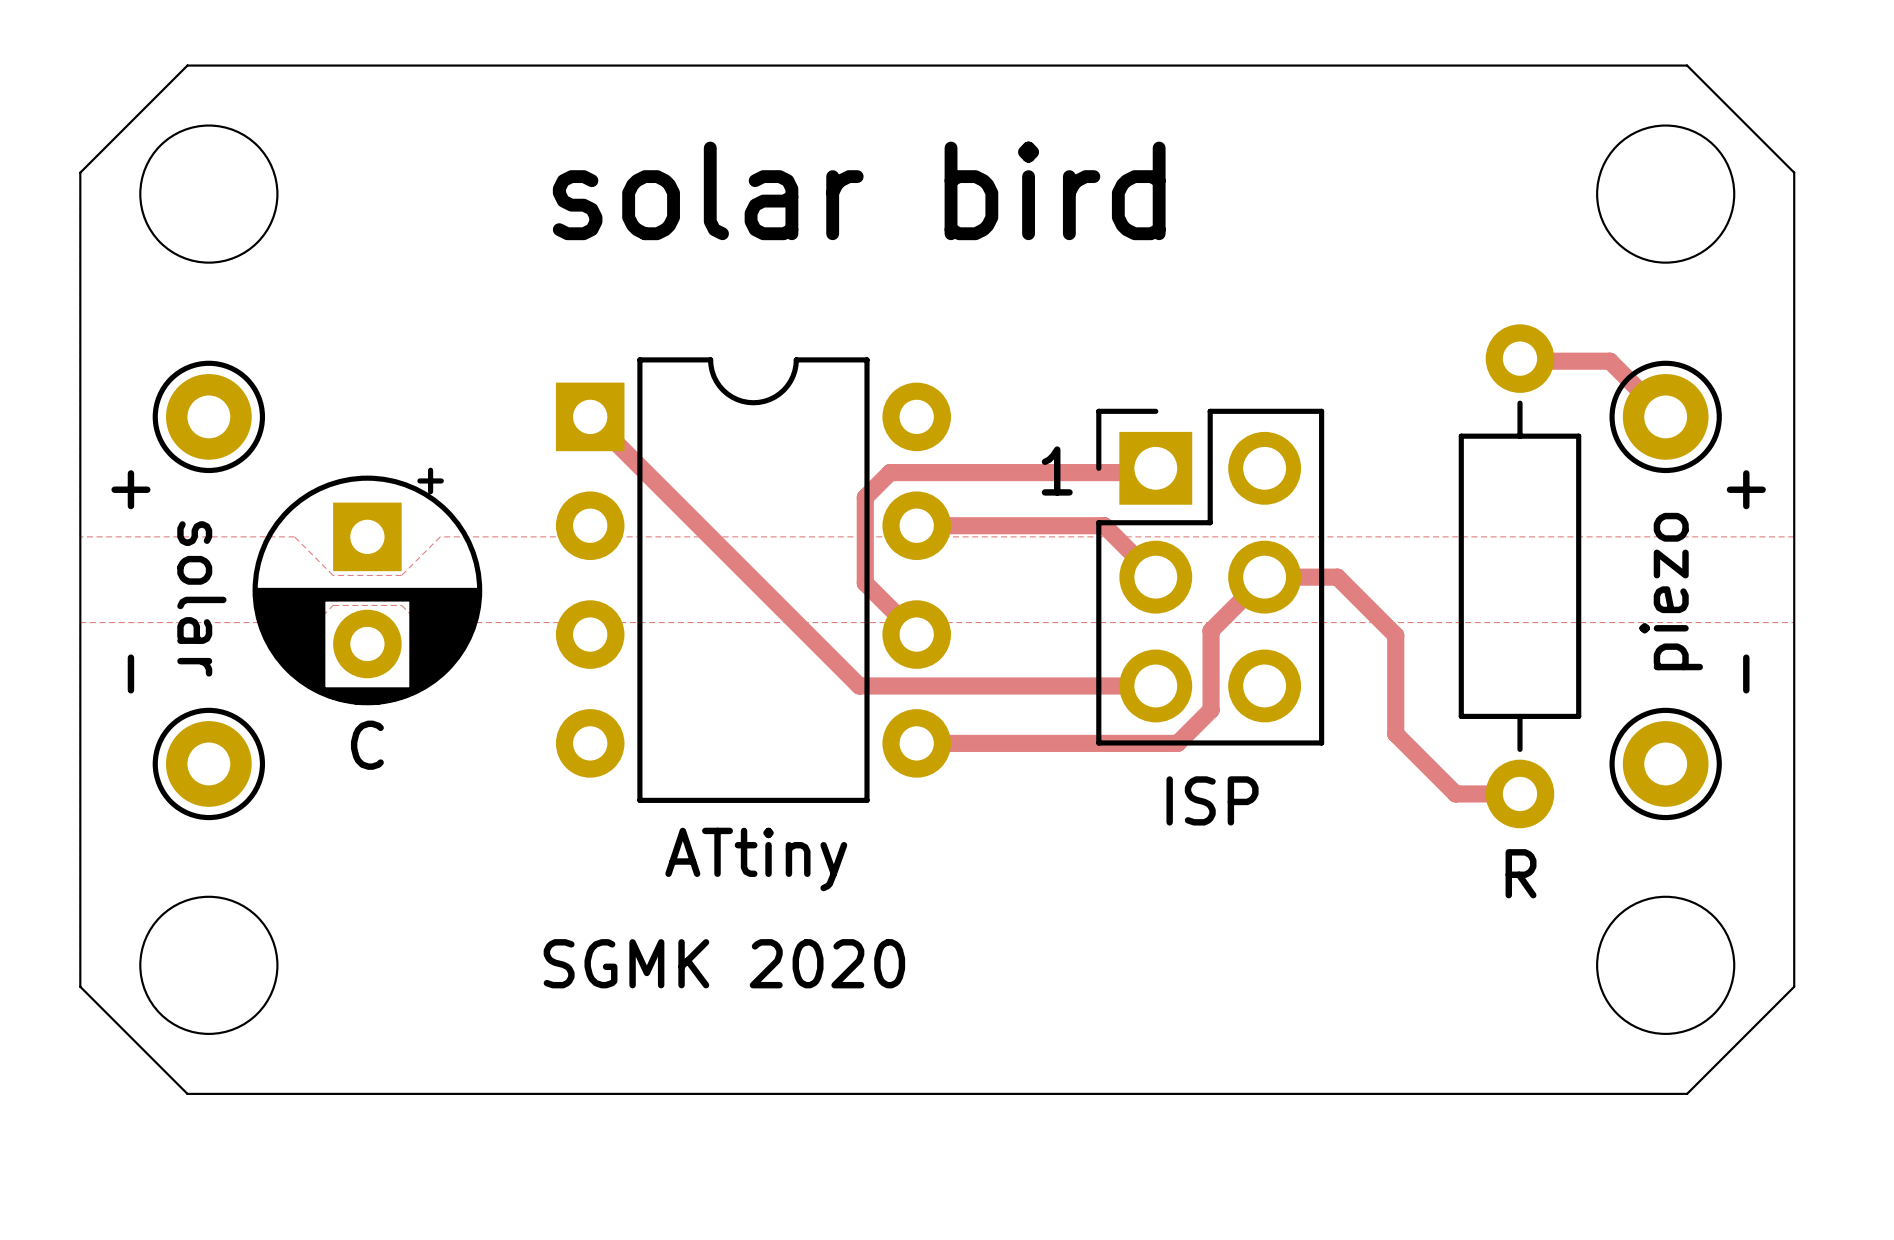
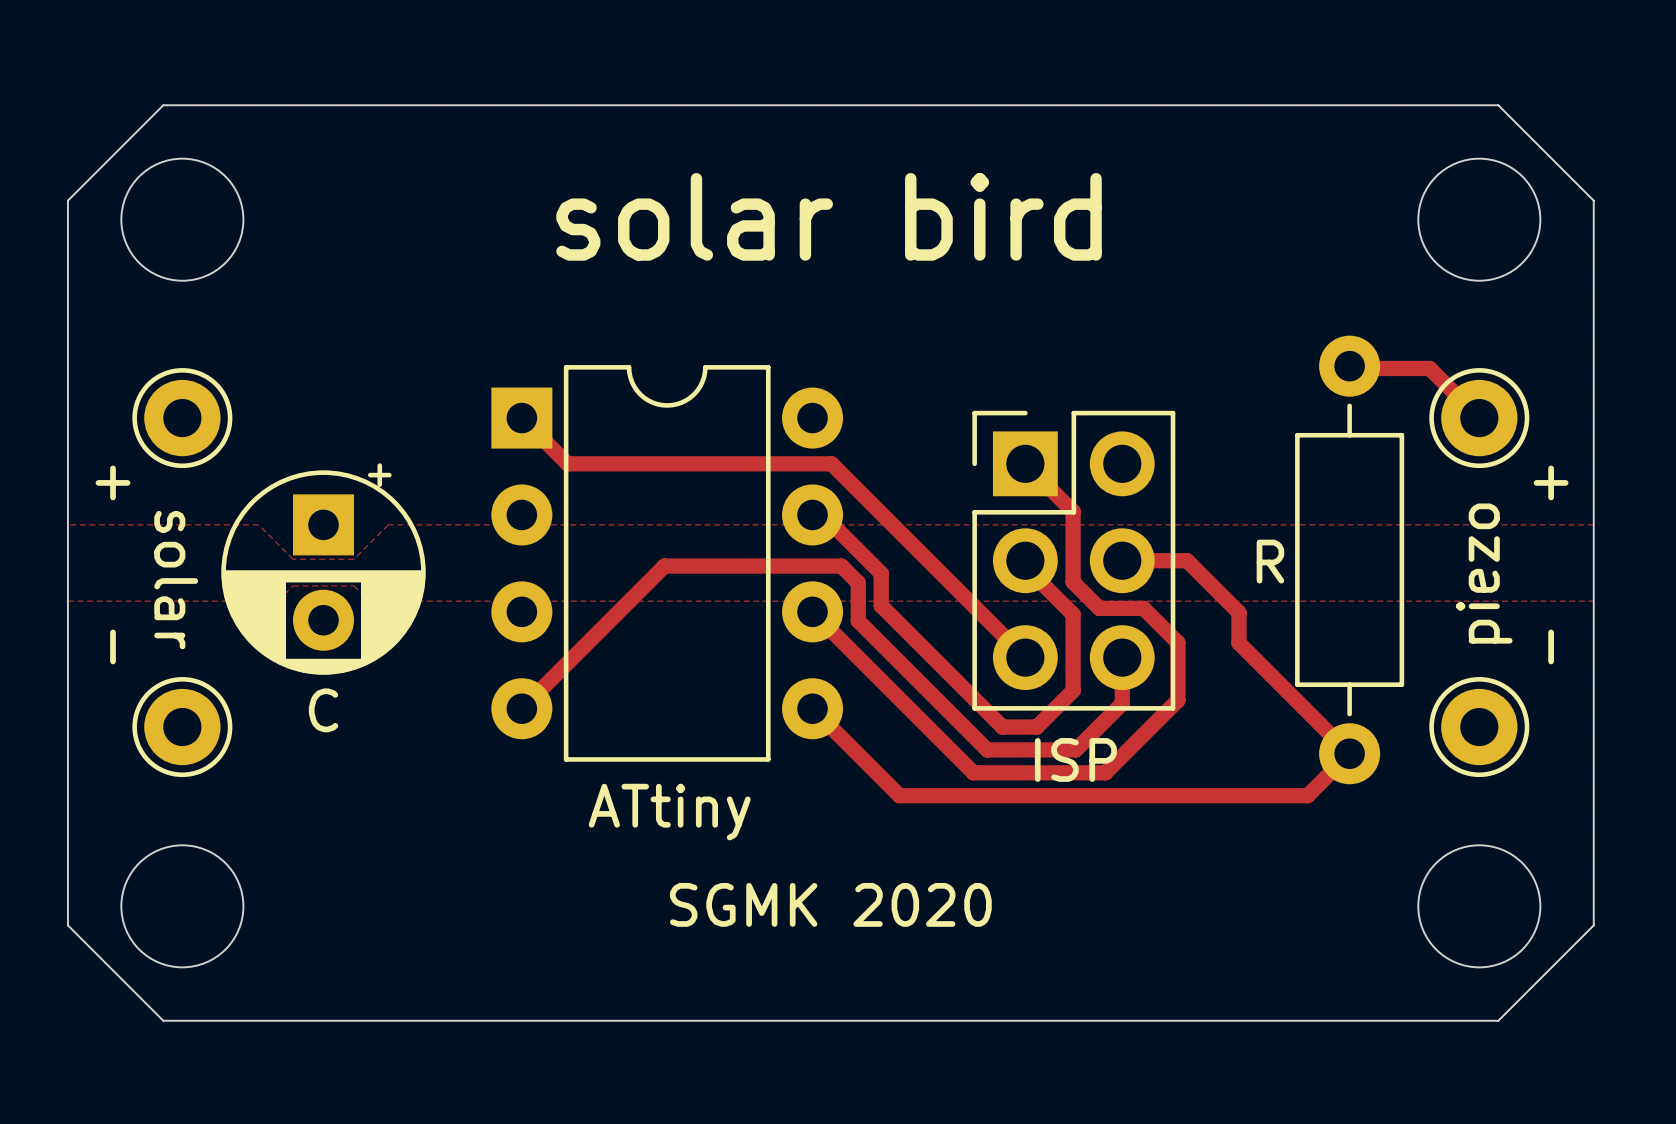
text position: solar bird (859, 190) -> solar bird (829, 216)
track: (641, 468) (859, 685) (1155, 685) -> (567, 463) (831, 463) (1025, 657)
track: (1155, 468) (1151, 472) (890, 472) (865, 497) (865, 583) (916, 634) -> (1025, 463) (1073, 511) (1073, 582) (1099, 608) (1143, 608) (1177, 642) (1177, 700) (1105, 772) (973, 772) (812, 611)
text: 1 (1057, 470) -> none
track: (928, 525) (1104, 525) (1155, 577) -> (822, 514) (881, 573) (881, 605) (1002, 727) (1036, 727) (1073, 690) (1073, 614) (1025, 566) (1025, 560)
track: (1264, 577) (1211, 630) (1211, 709) (1177, 743) (916, 743) -> (1239, 643) (1349, 753) (1307, 795) (899, 795) (812, 708)
track: (1395, 669) (1395, 733) (1455, 793) (1520, 793) -> none
track: none -> (1122, 657) (1122, 703) (1075, 749) (987, 749) (858, 621) (858, 582) (841, 566) (664, 566) (521, 708)
text position: R (1521, 873) -> R (1270, 561)
text position: SGMK 2020 (724, 963) -> SGMK 2020 (830, 904)

